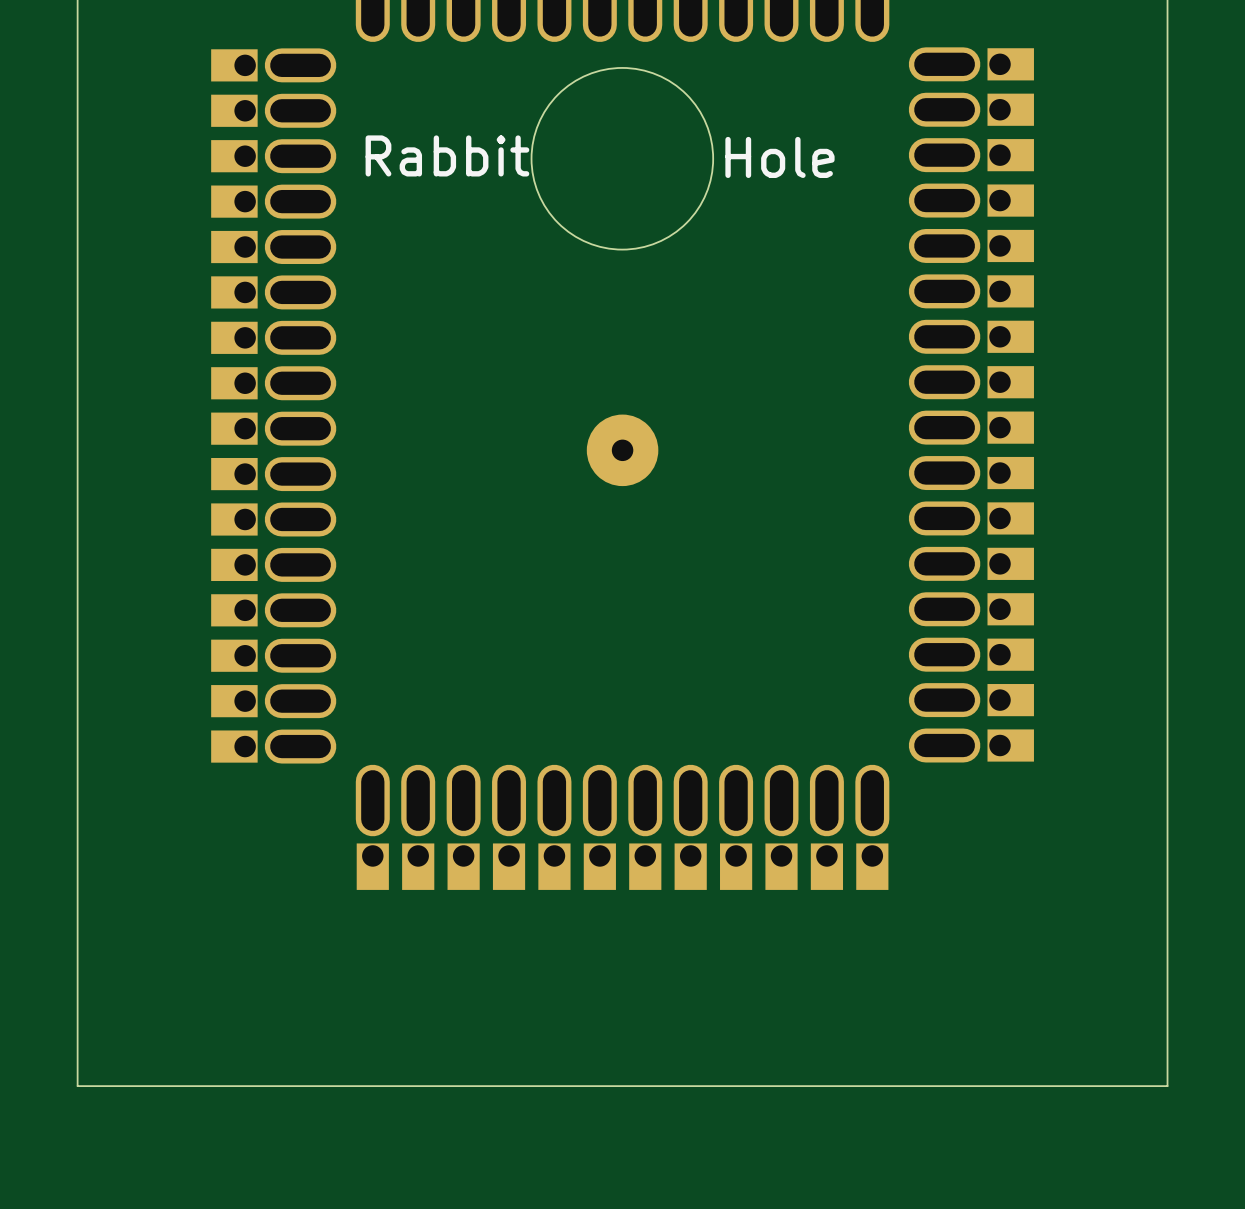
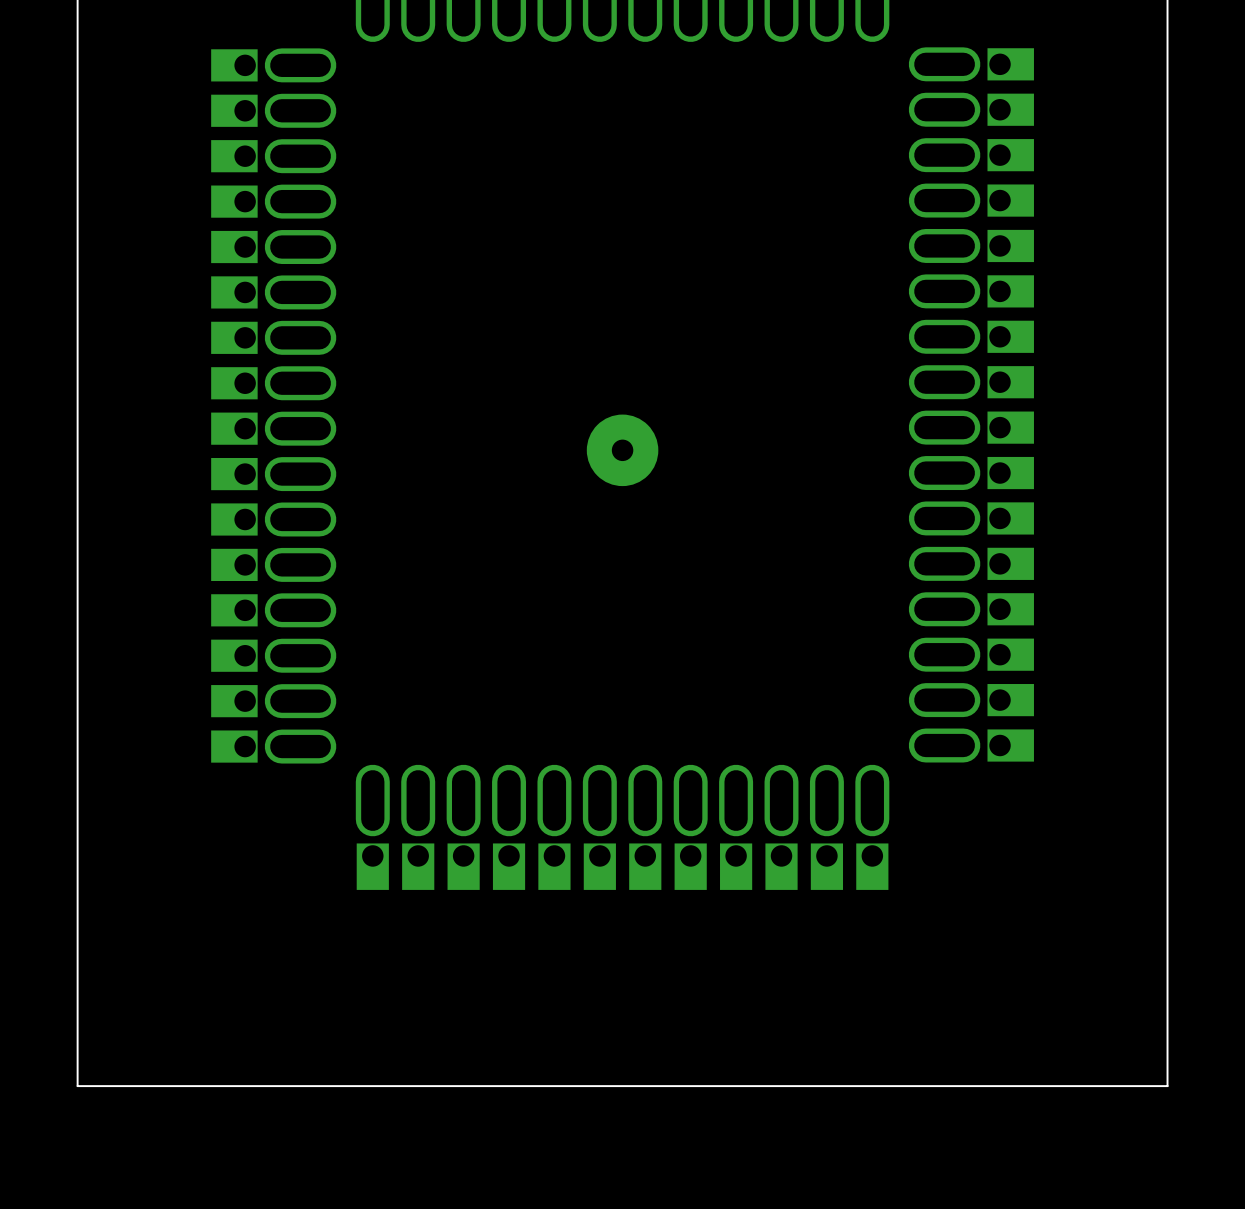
round board edge: [530, 67, 715, 251] -> none
text: Rabbit (447, 155) -> none
text: Hole (779, 157) -> none

